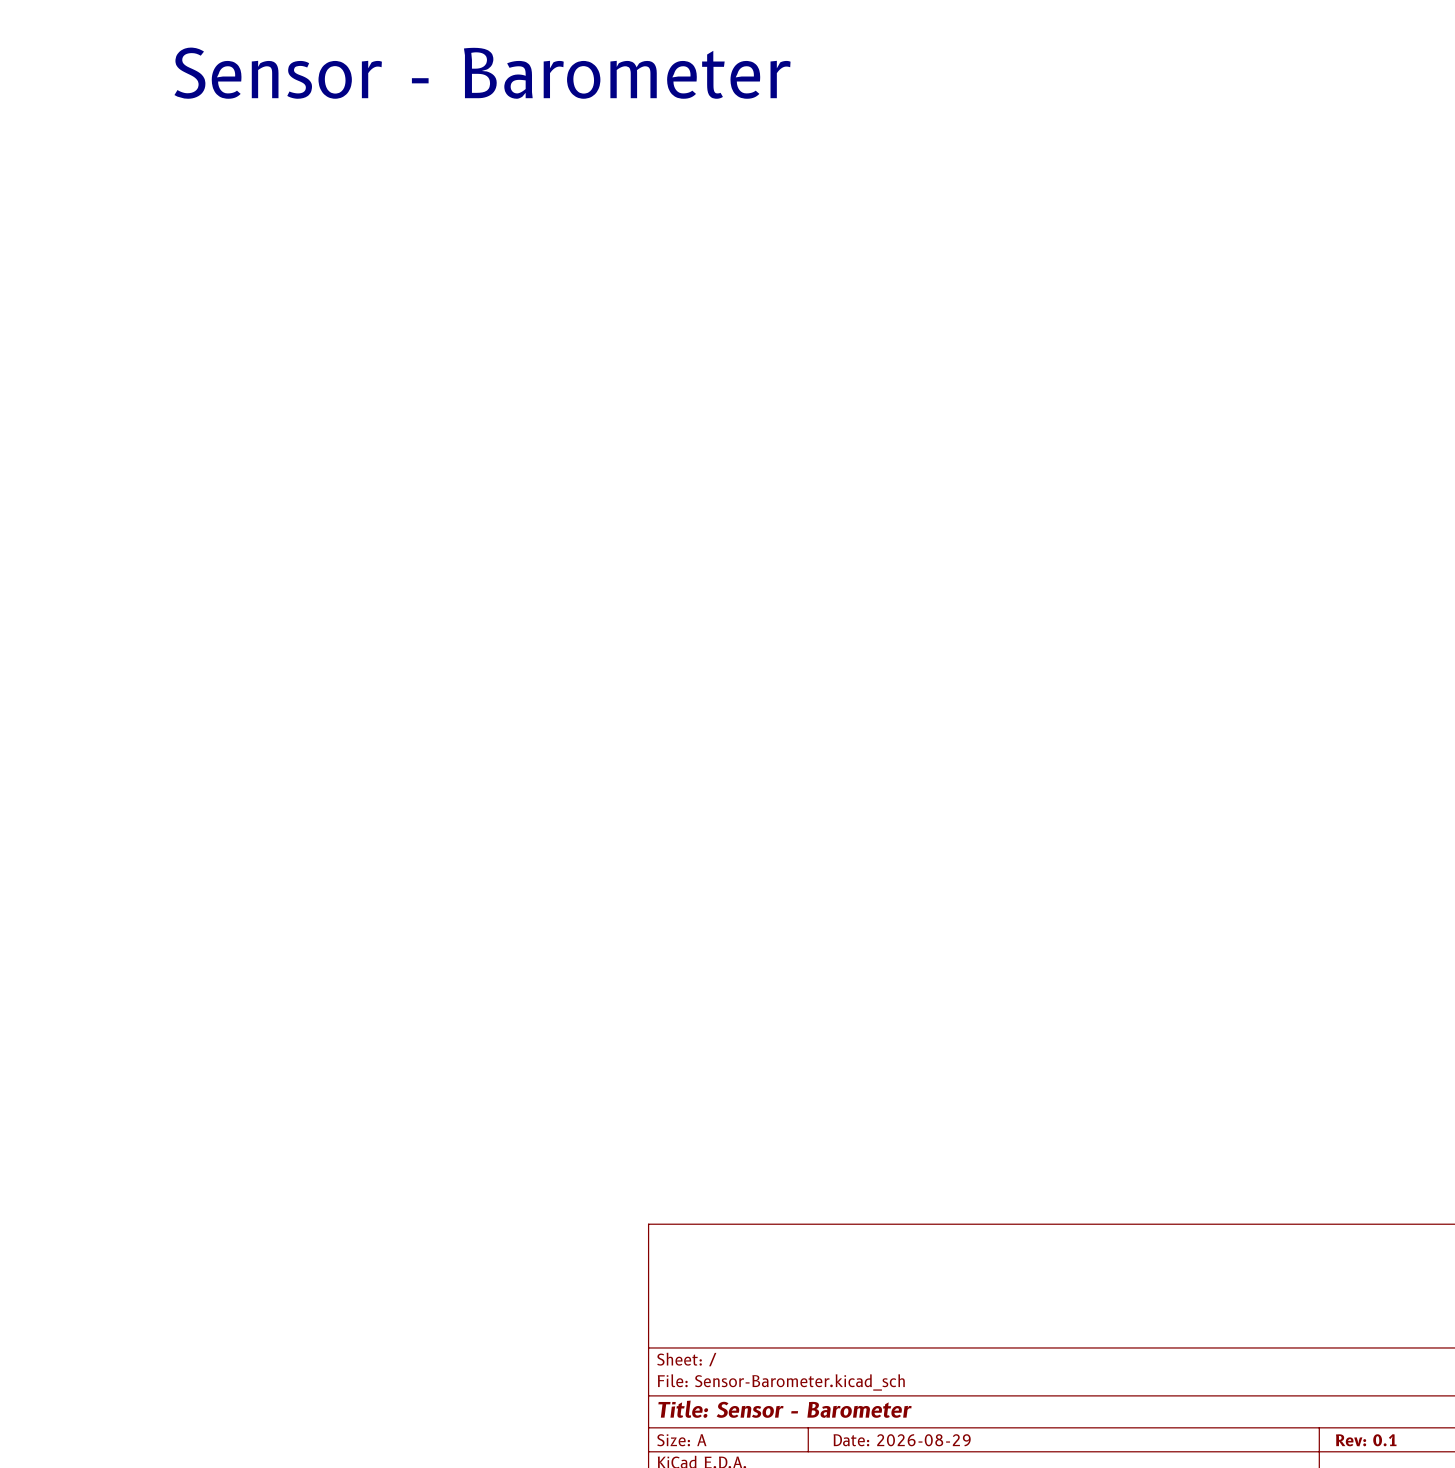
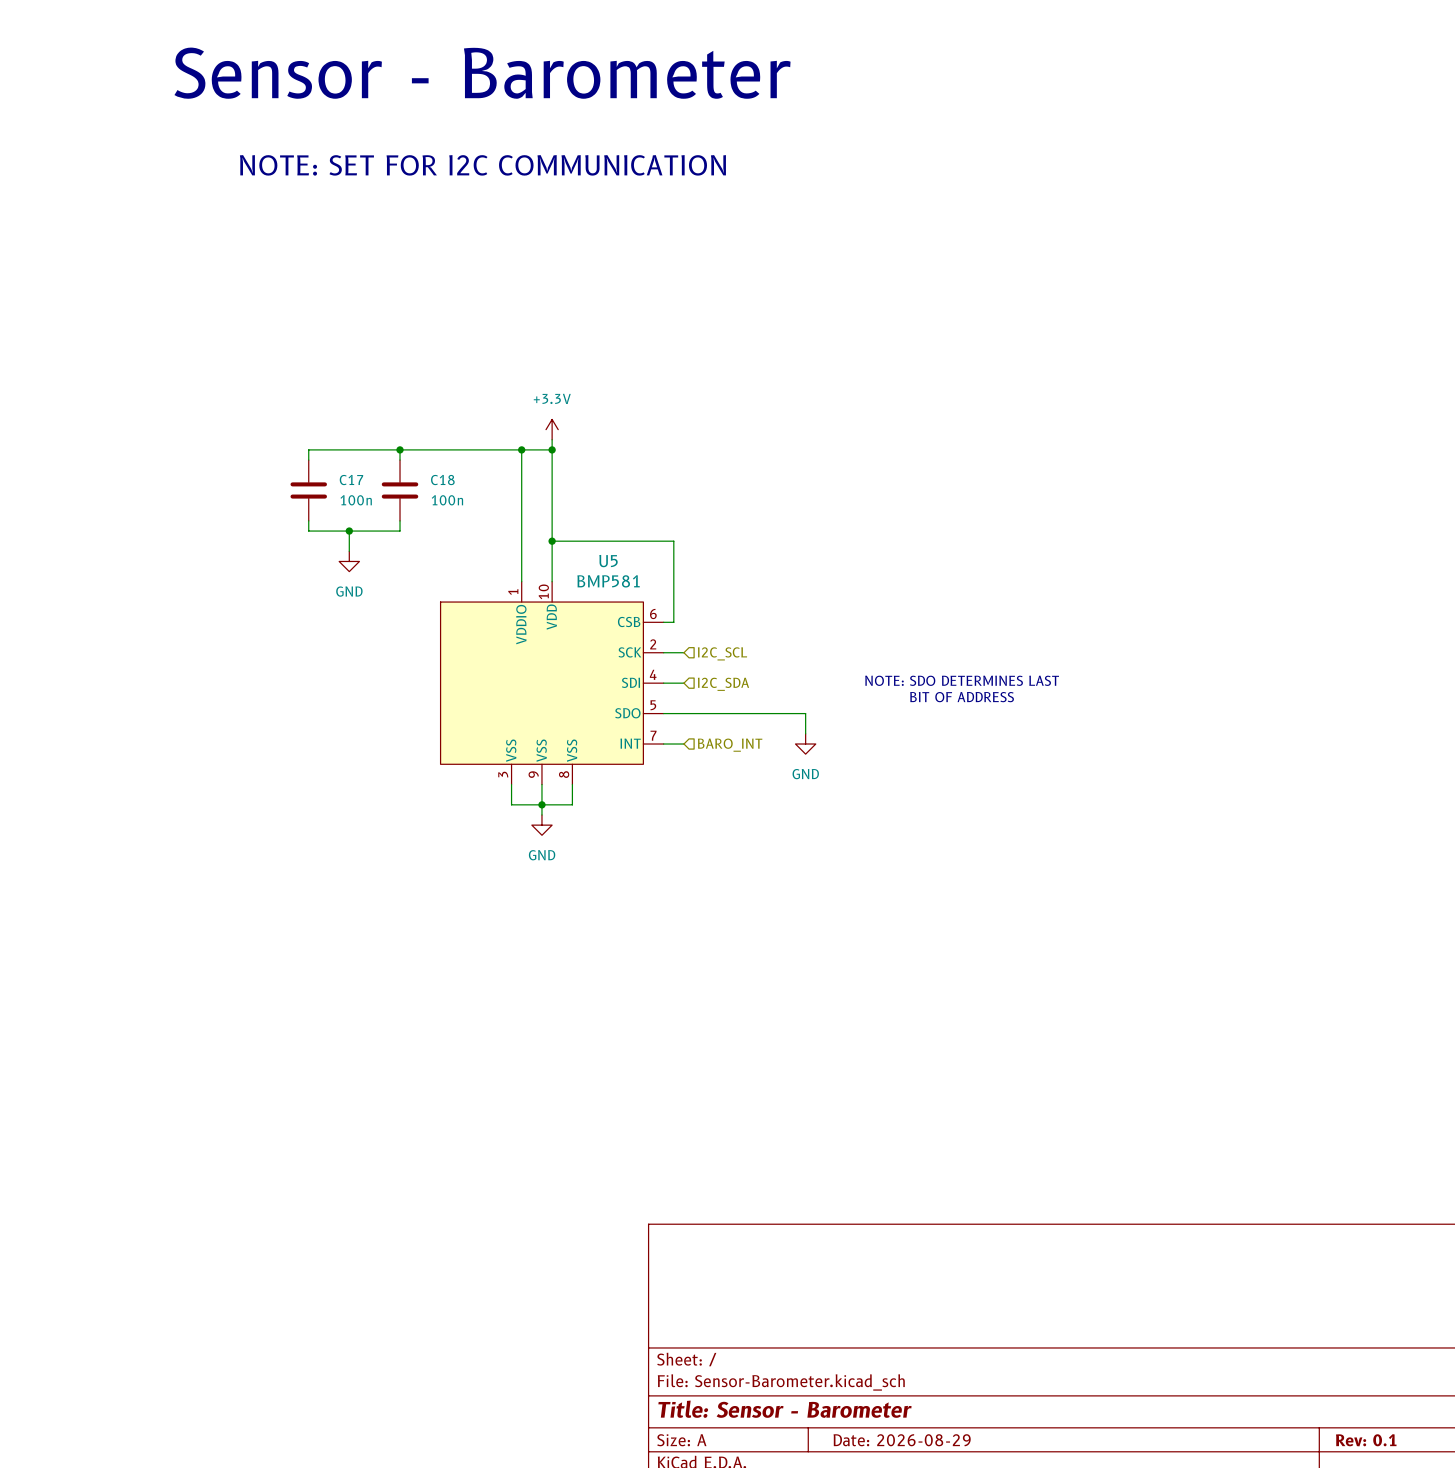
text: none -> NOTE: SET FOR I2C COMMUNICATION (482, 165)
power symbol: none -> +3.3V (552, 429)
wire: none -> (552, 439) (552, 581)
wire: none -> (400, 449) (400, 460)
junction: none -> (400, 449)
wire: none -> (521, 449) (521, 581)
junction: none -> (521, 449)
wire: none -> (552, 449) (308, 449) (308, 460)
junction: none -> (552, 449)
C17: none -> 100n (308, 490)
C18: none -> 100n (400, 490)
wire: none -> (308, 520) (308, 531) (400, 531) (400, 520)
wire: none -> (349, 531) (349, 551)
junction: none -> (349, 531)
wire: none -> (552, 541) (673, 541) (673, 622) (663, 622)
junction: none -> (552, 541)
power symbol: none -> GND (349, 561)
wire: none -> (663, 652) (683, 652)
hierarchical label: none -> I2C_SCL (722, 653)
text: none -> NOTE: SDO DETERMINES LAST (962, 680)
U5: none -> BMP581 (552, 683)
wire: none -> (663, 683) (683, 683)
hierarchical label: none -> I2C_SDA (723, 684)
text: none -> BIT OF ADDRESS (962, 697)
wire: none -> (663, 713) (805, 713) (805, 733)
wire: none -> (663, 744) (683, 744)
power symbol: none -> GND (805, 744)
hierarchical label: none -> BARO_INT (730, 745)
wire: none -> (511, 784) (511, 804) (572, 804) (572, 784)
wire: none -> (541, 784) (541, 814)
junction: none -> (541, 804)
power symbol: none -> GND (541, 825)

